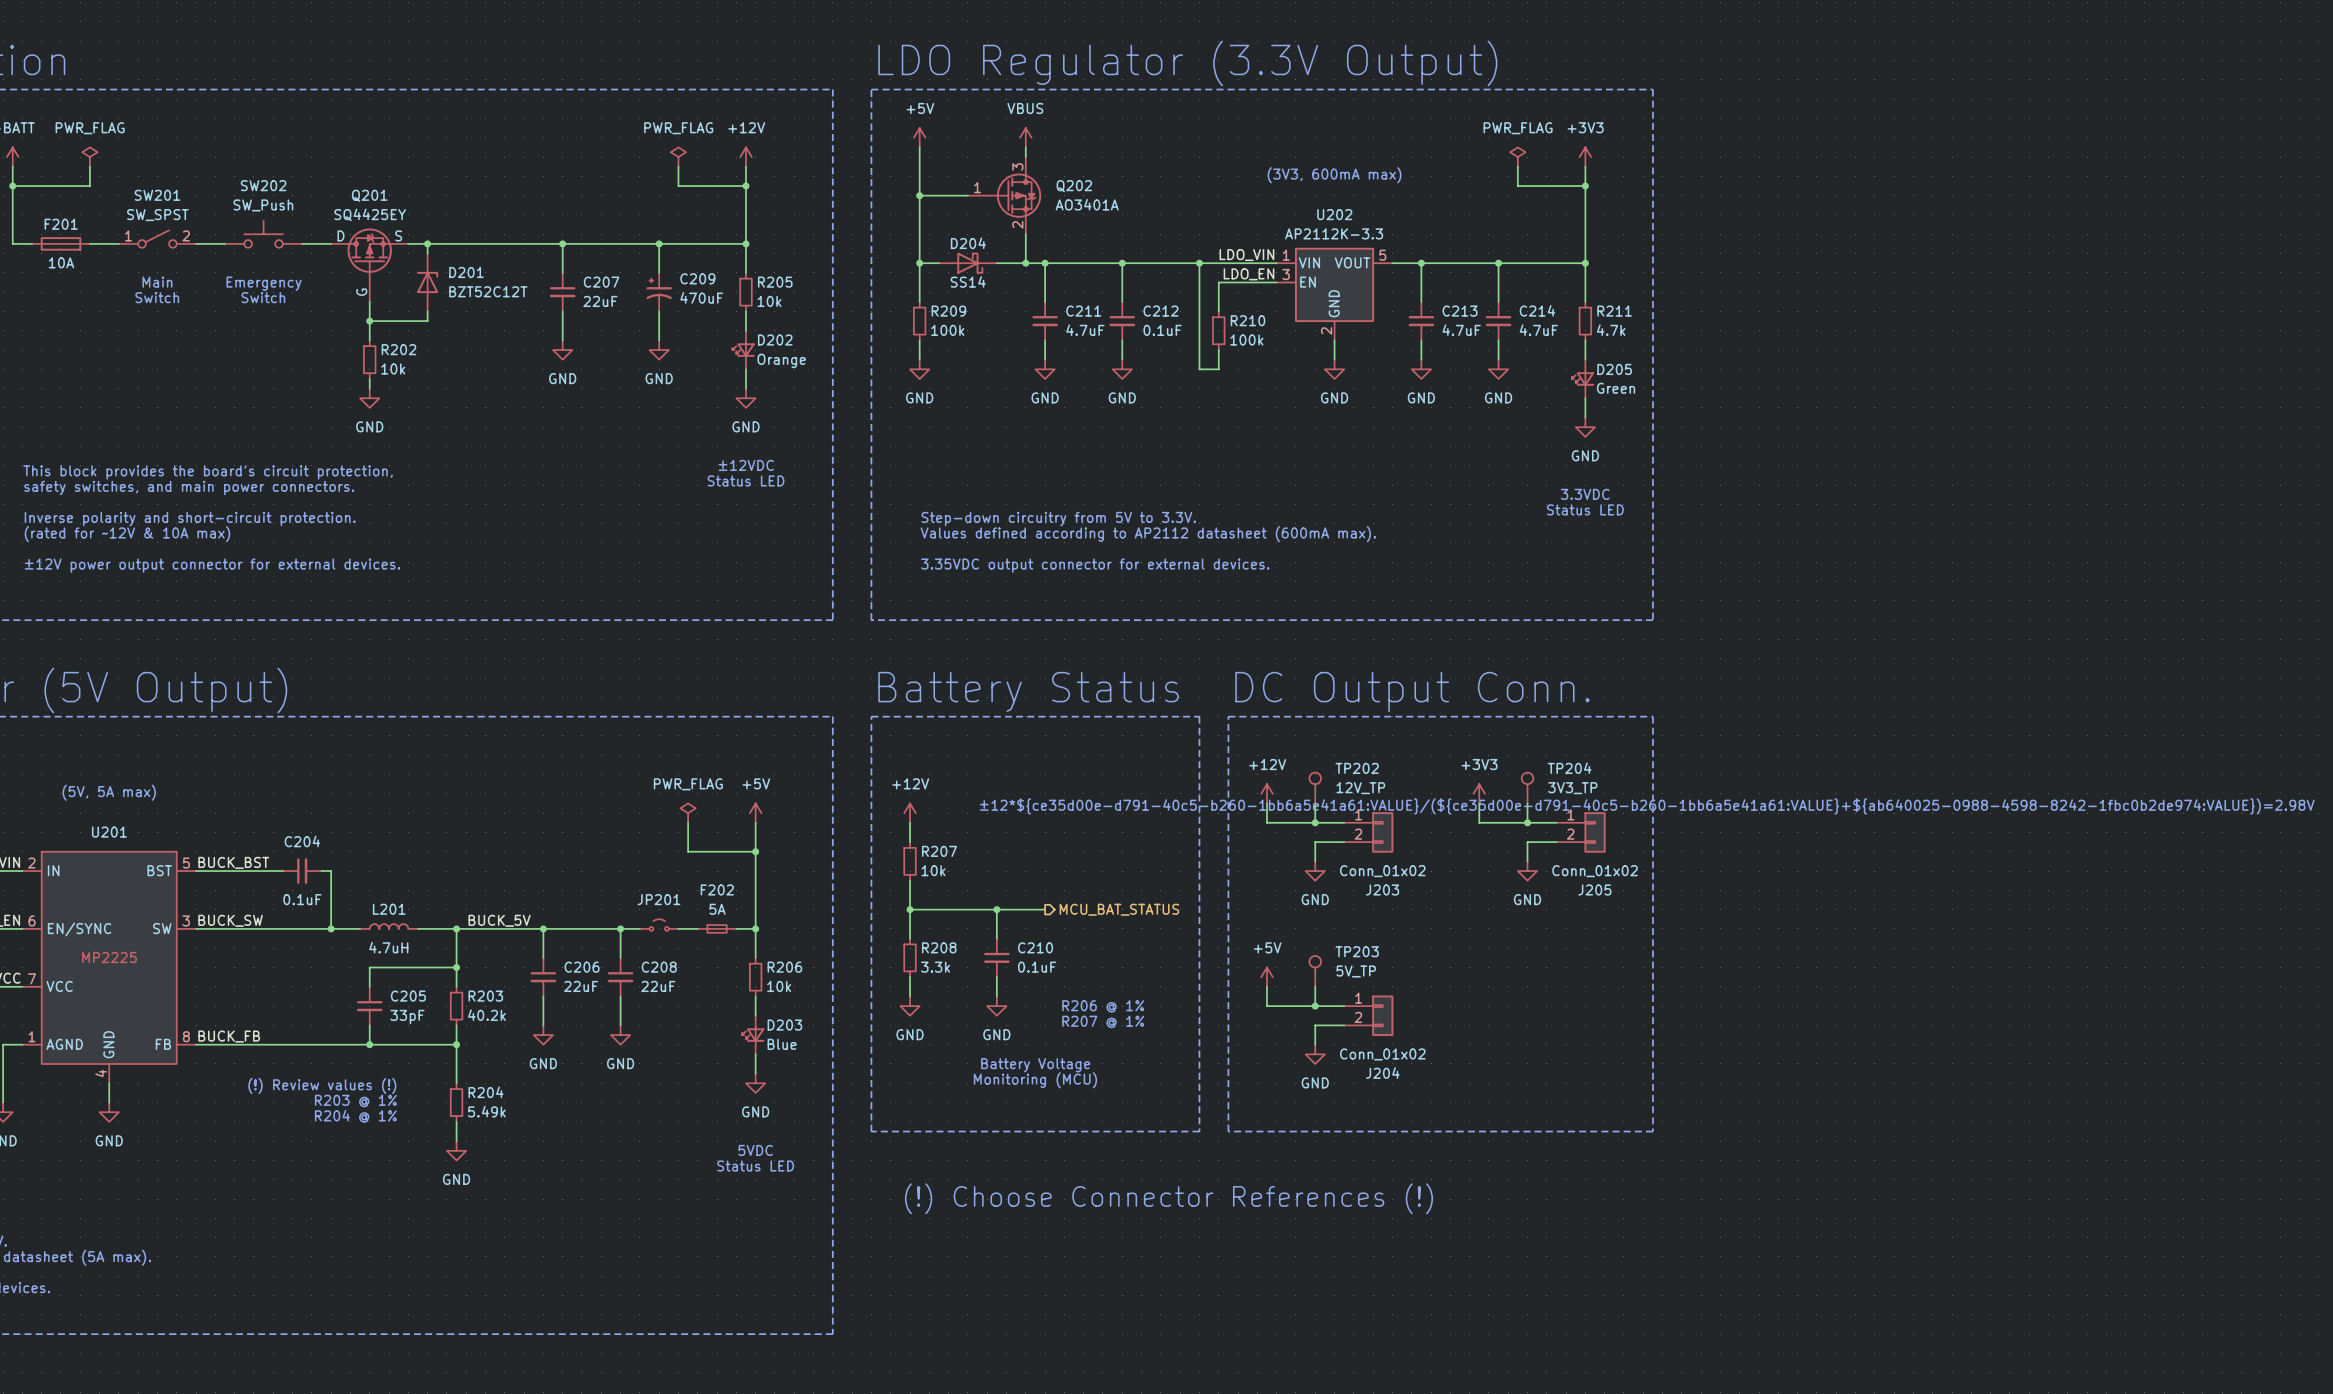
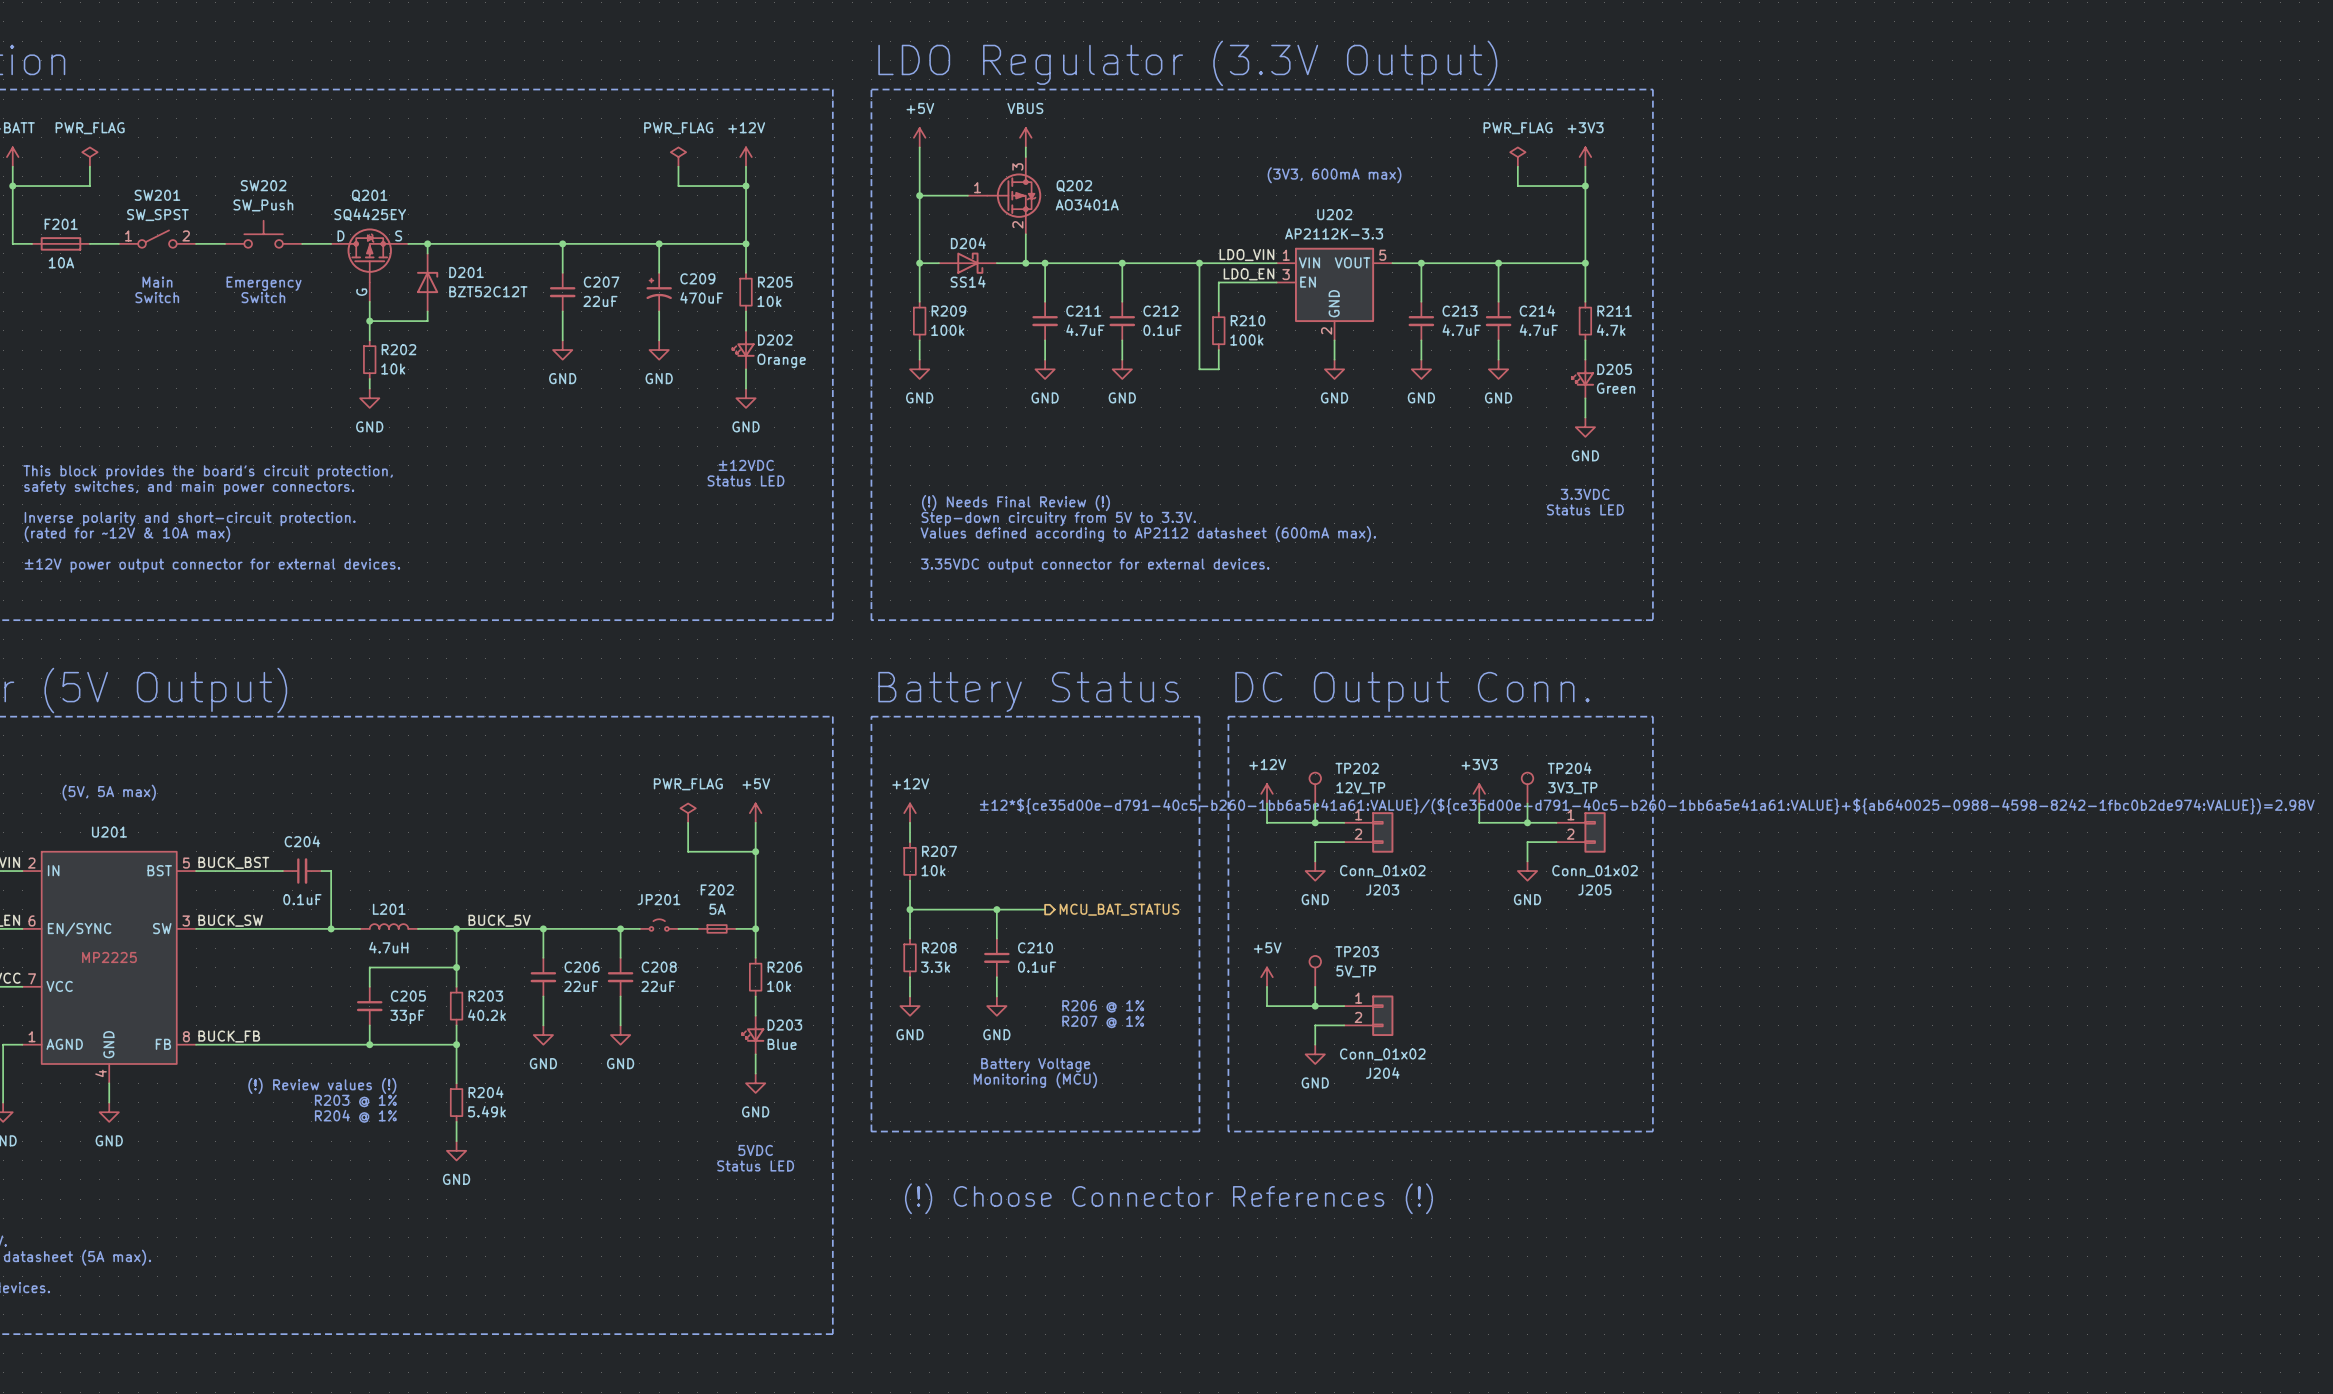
text: none -> (!) Needs Final Review (!) (1015, 503)

